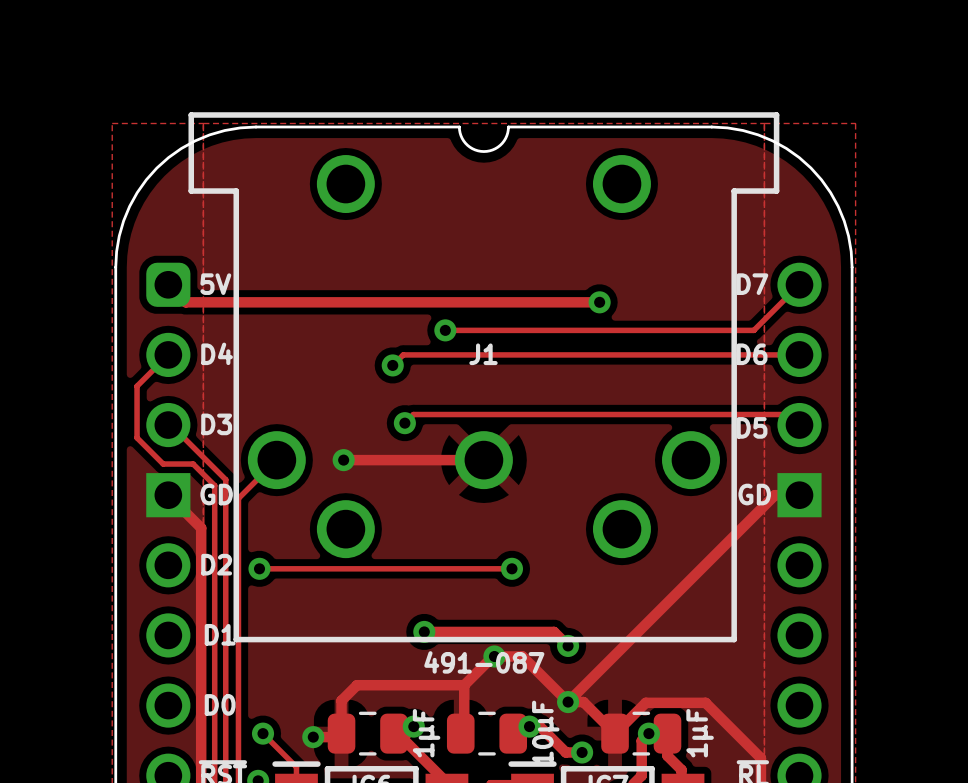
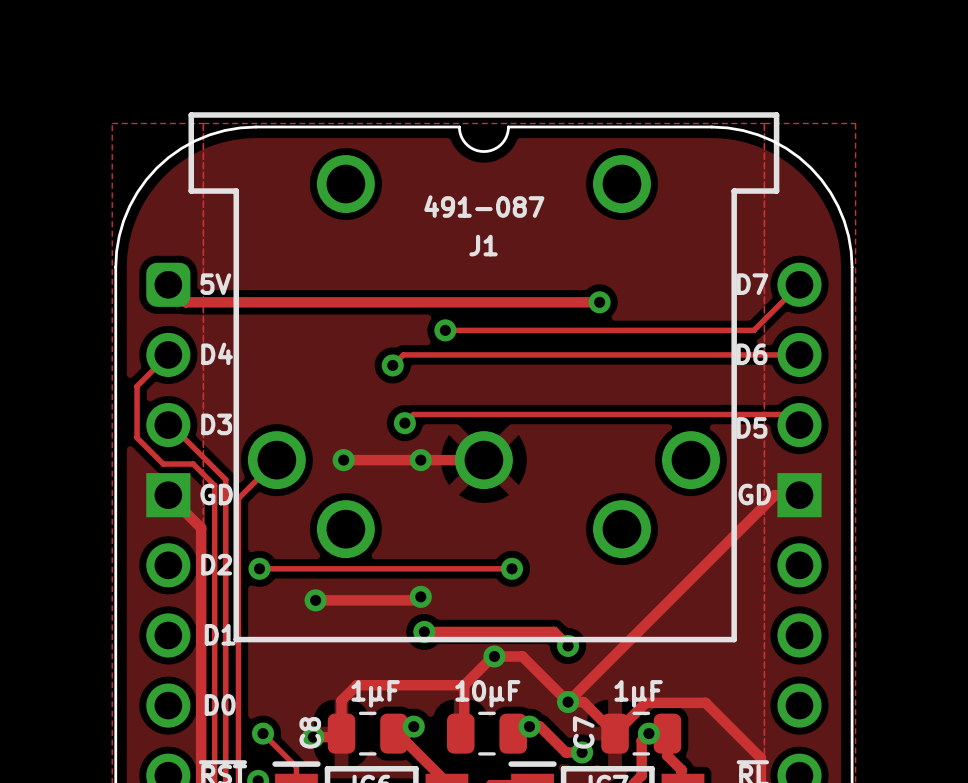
J1 name position: J1 (483, 354) -> J1 (483, 245)
via: none -> (420, 460)
track: none -> (420, 596) (417, 600) (315, 600)
via: none -> (420, 596)
via: none -> (315, 600)
J1 value position: 491-087 (484, 662) -> 491-087 (484, 206)
C8 name: none -> C8 (310, 732)
C7 name: none -> C7 (583, 732)
C8 value rotation: 0° (426, 733) -> 90° clockwise (375, 693)
part value rotation: 0° (545, 733) -> 90° clockwise (487, 693)
C7 value rotation: 0° (700, 733) -> 90° clockwise (638, 693)
C7 value position: 1μF (700, 733) -> 1μF (638, 693)

